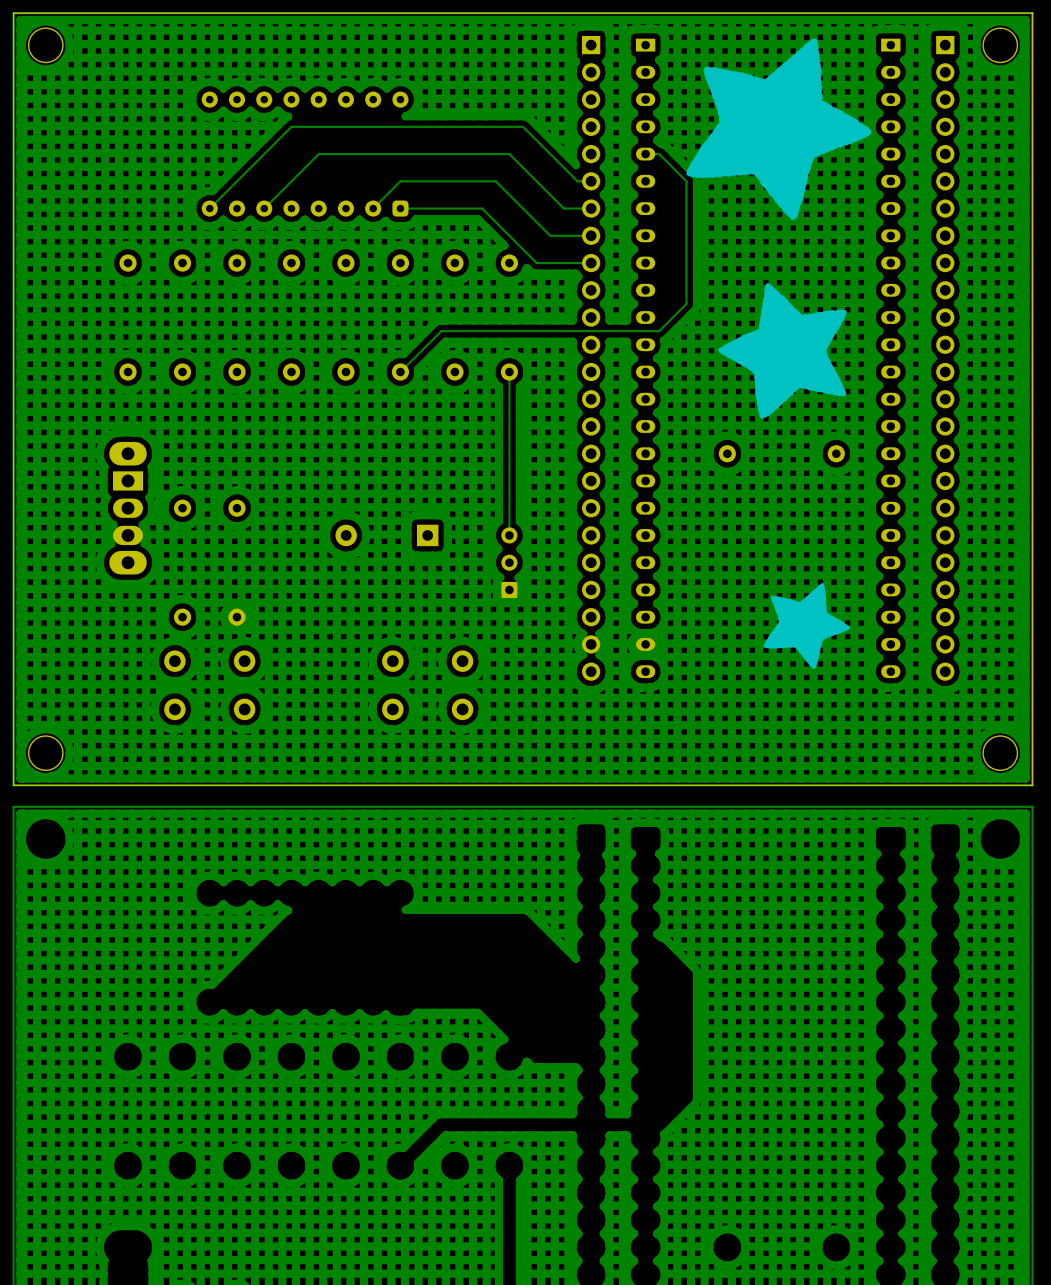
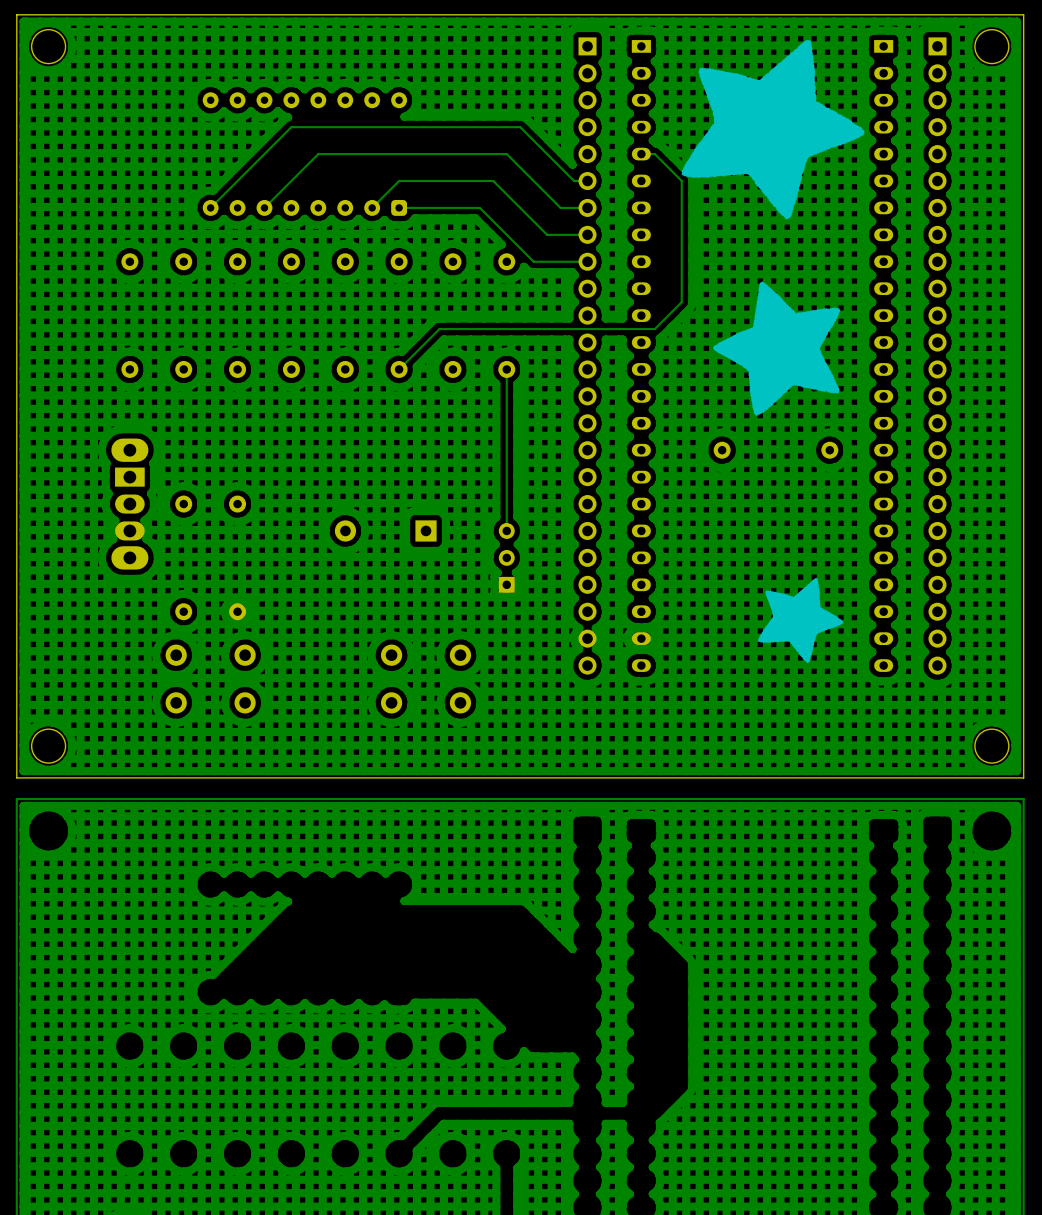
track: (1032, 13) (13, 13) (13, 785) (1032, 785) (1032, 13) -> none

